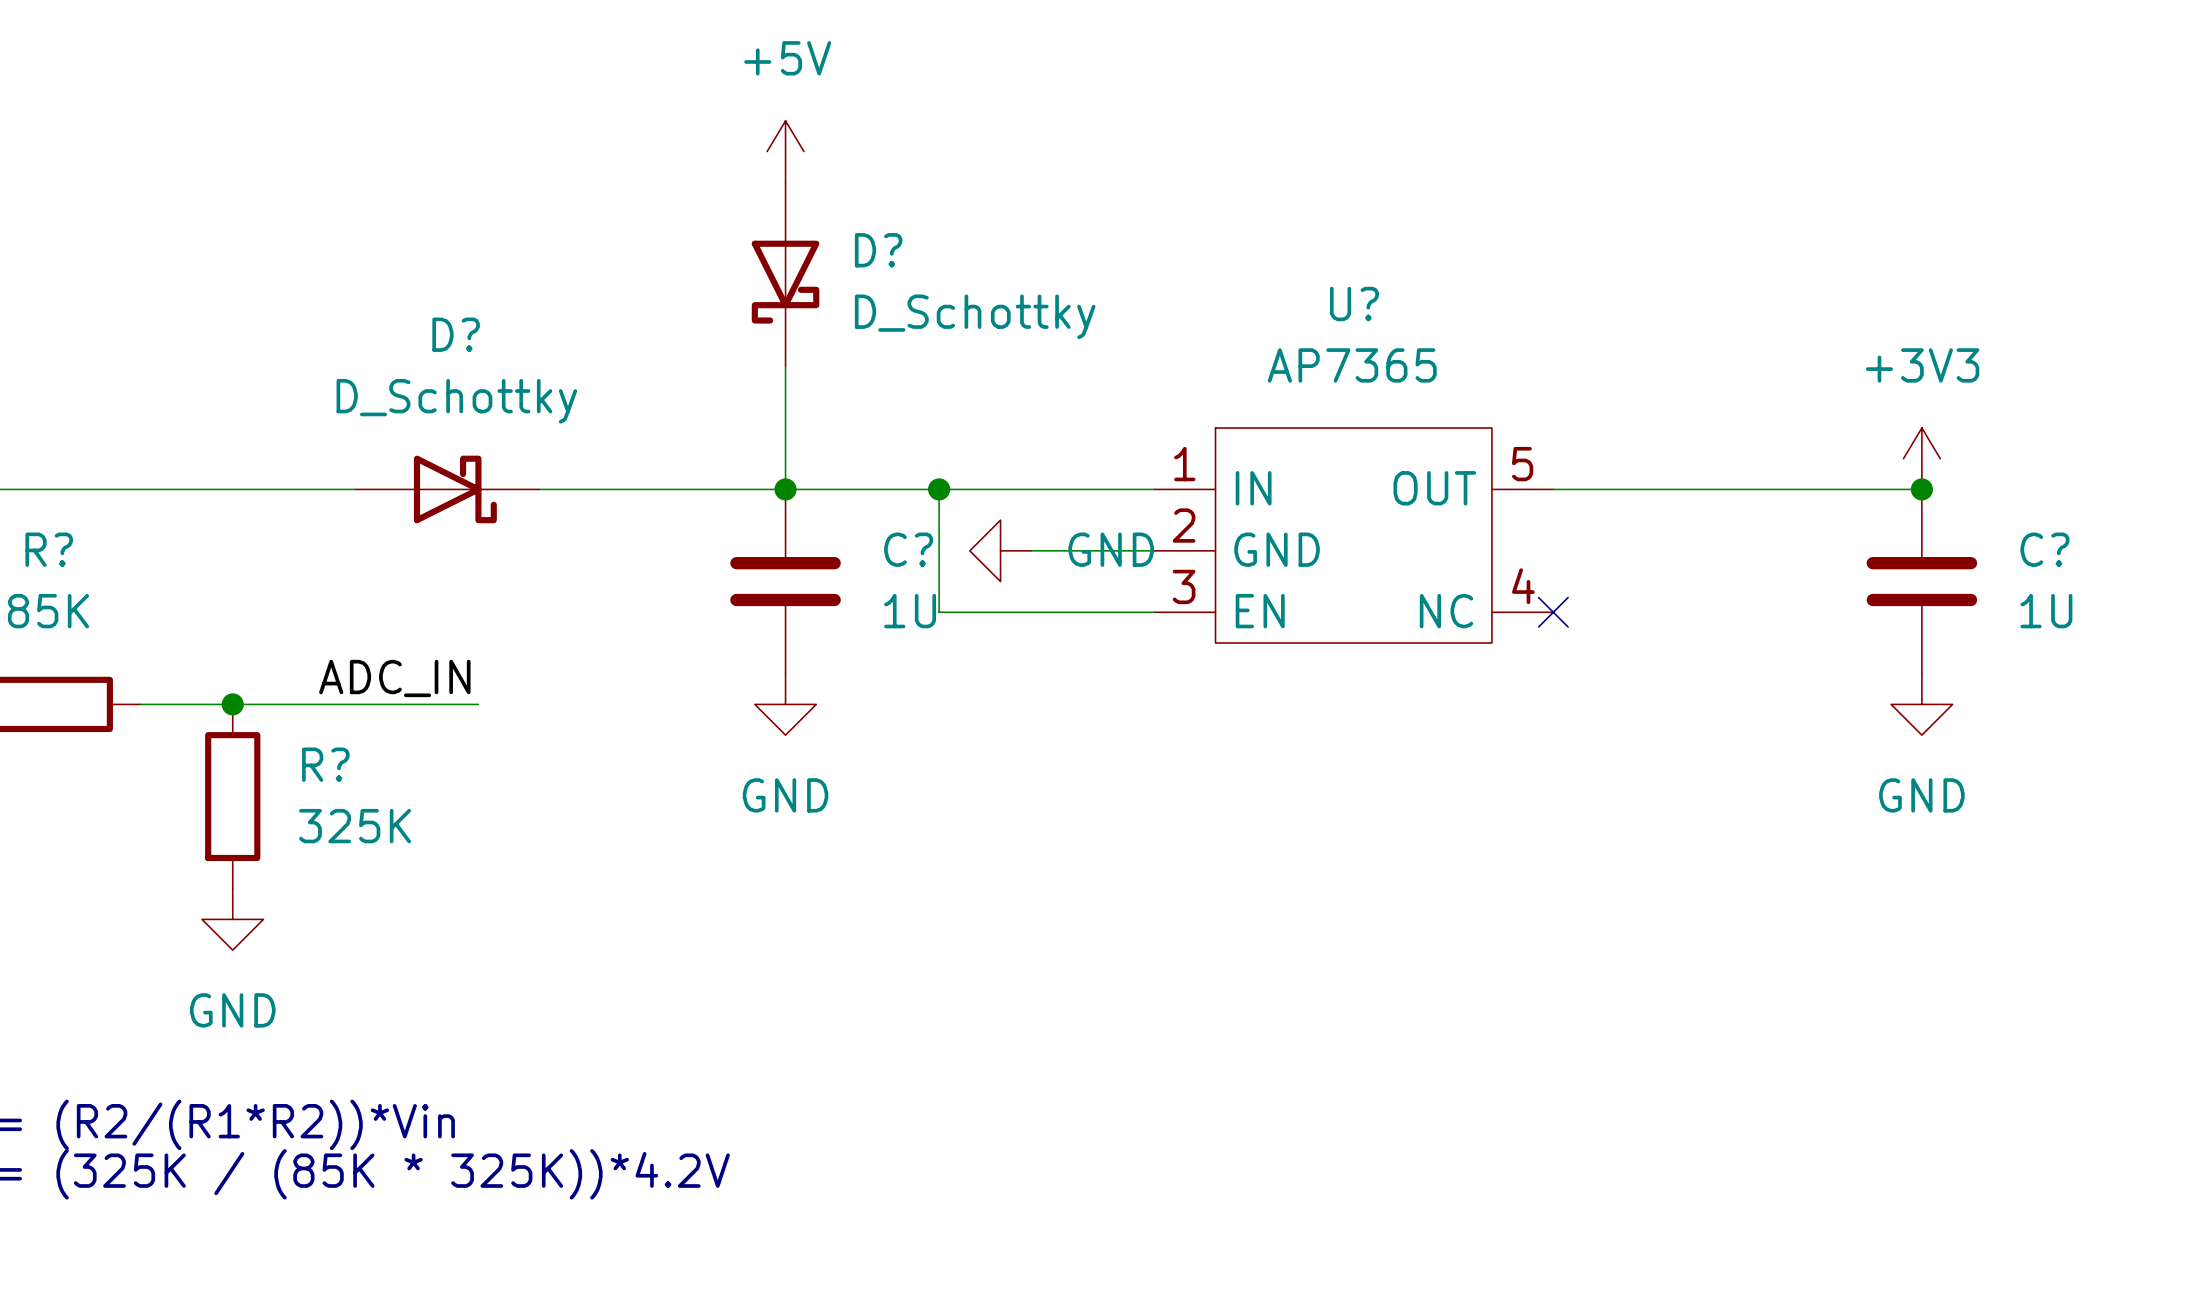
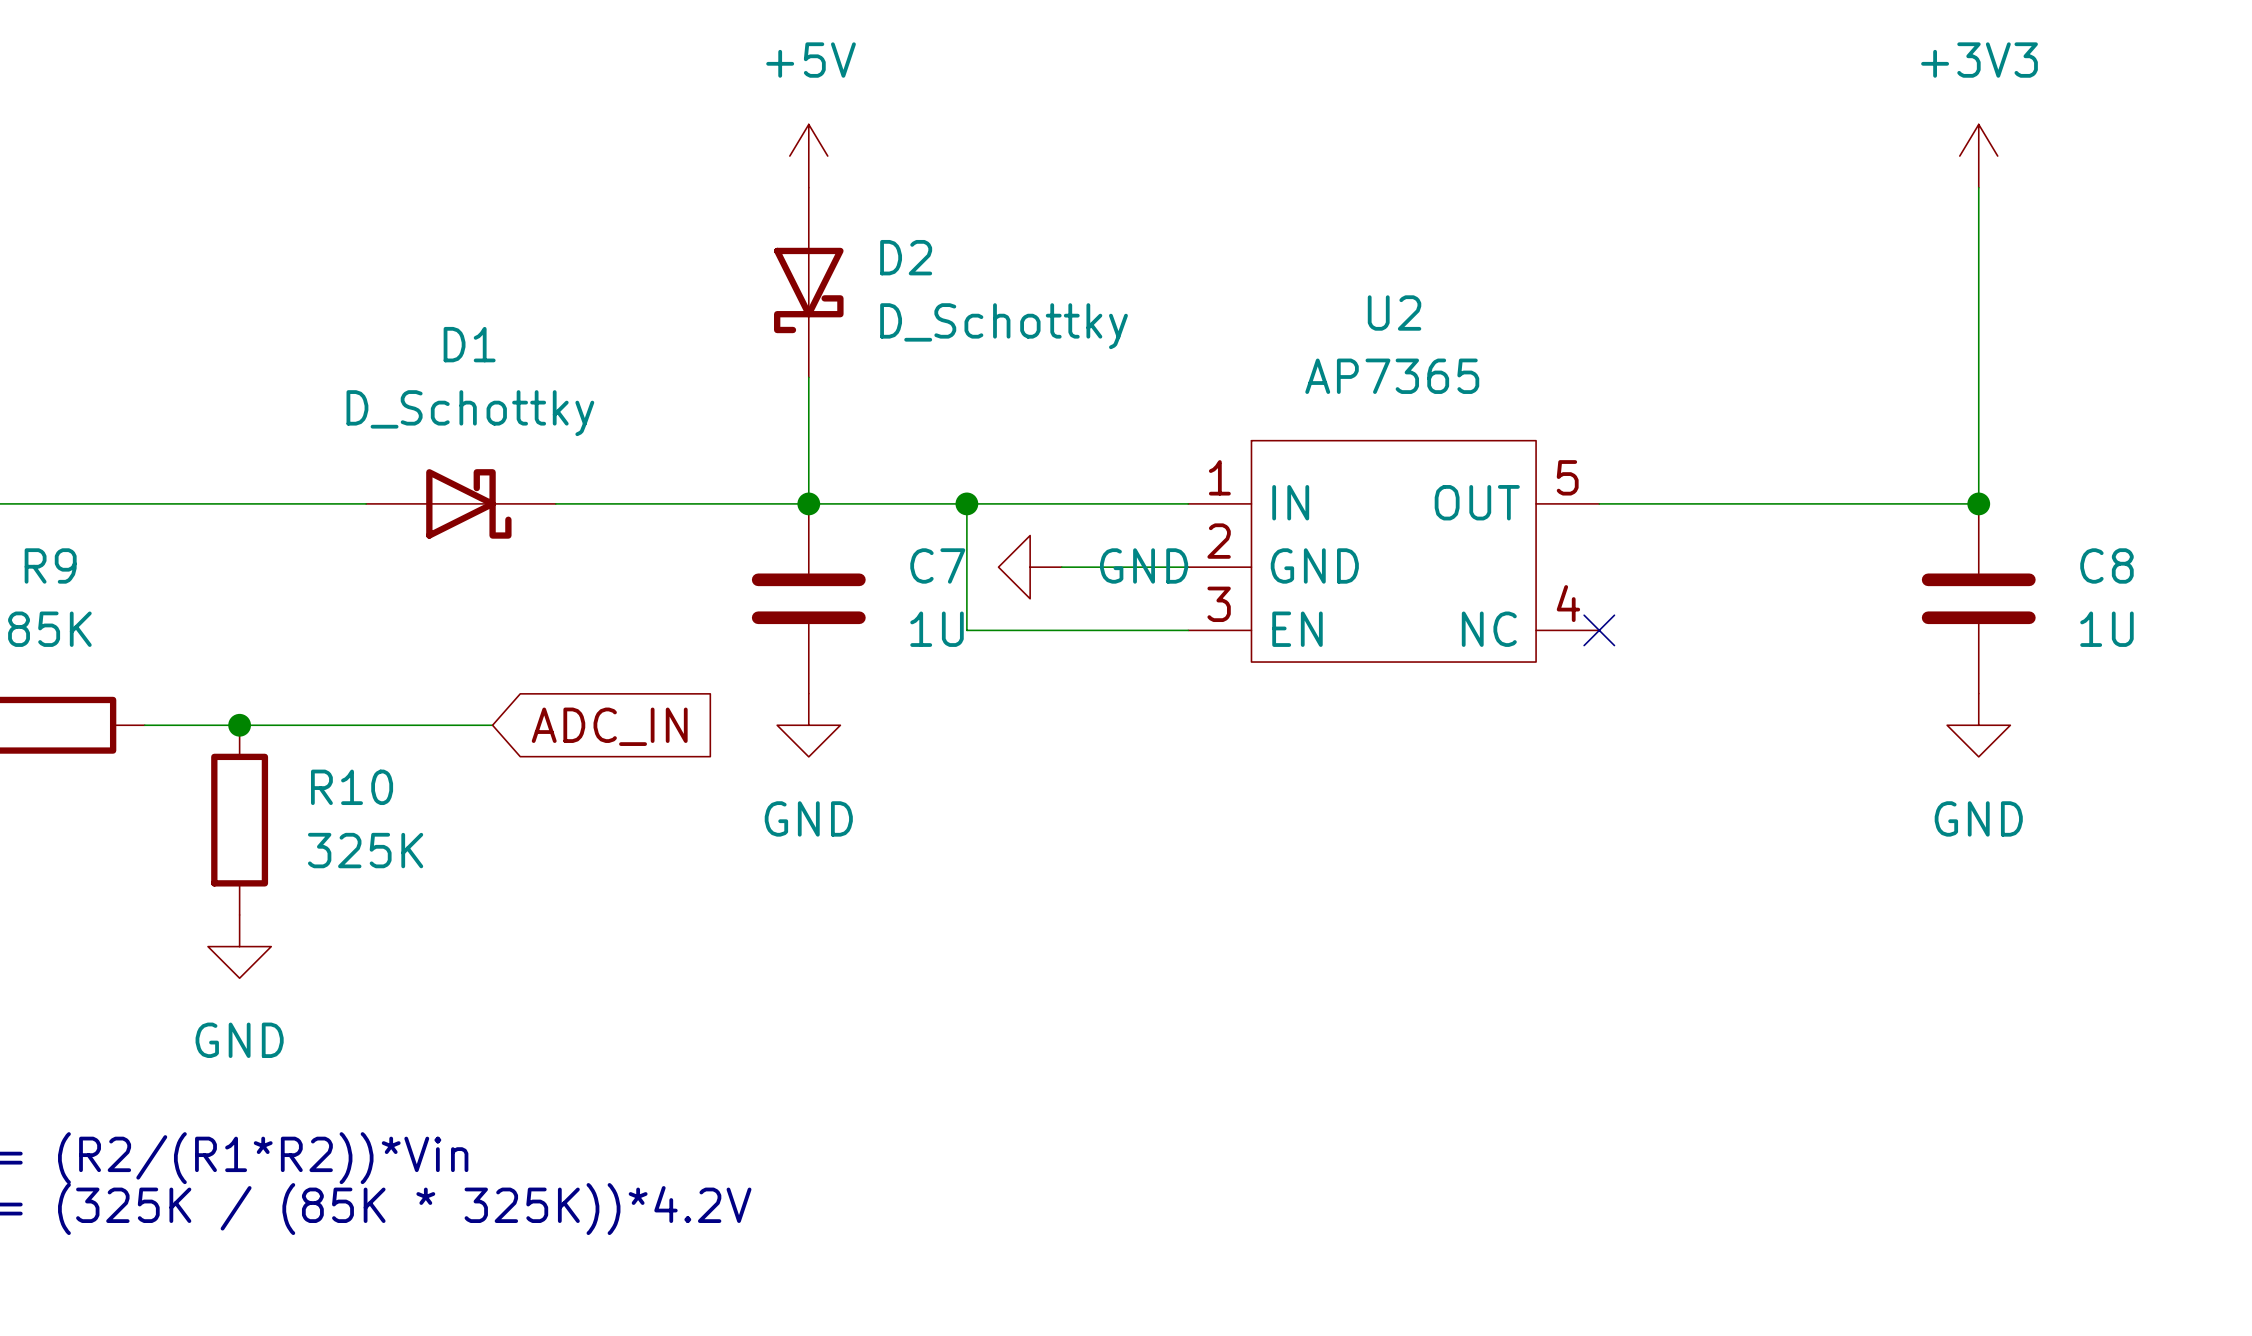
wire: none -> (1978, 187) (1978, 503)
D? name: D? (878, 250) -> D2 (906, 257)
U? name: U? (1354, 304) -> U2 (1394, 313)
D? name: D? (456, 334) -> D1 (469, 344)
power symbol position: +3V3 (1921, 458) -> +3V3 (1978, 156)
R? name: R? (49, 549) -> R9 (50, 565)
C? name: C? (908, 549) -> C7 (937, 565)
C? name: C? (2044, 549) -> C8 (2106, 565)
label: ADC_IN (394, 678) -> none
global label: none -> ADC_IN (609, 726)
R? name: R? (325, 764) -> R10 (352, 787)

